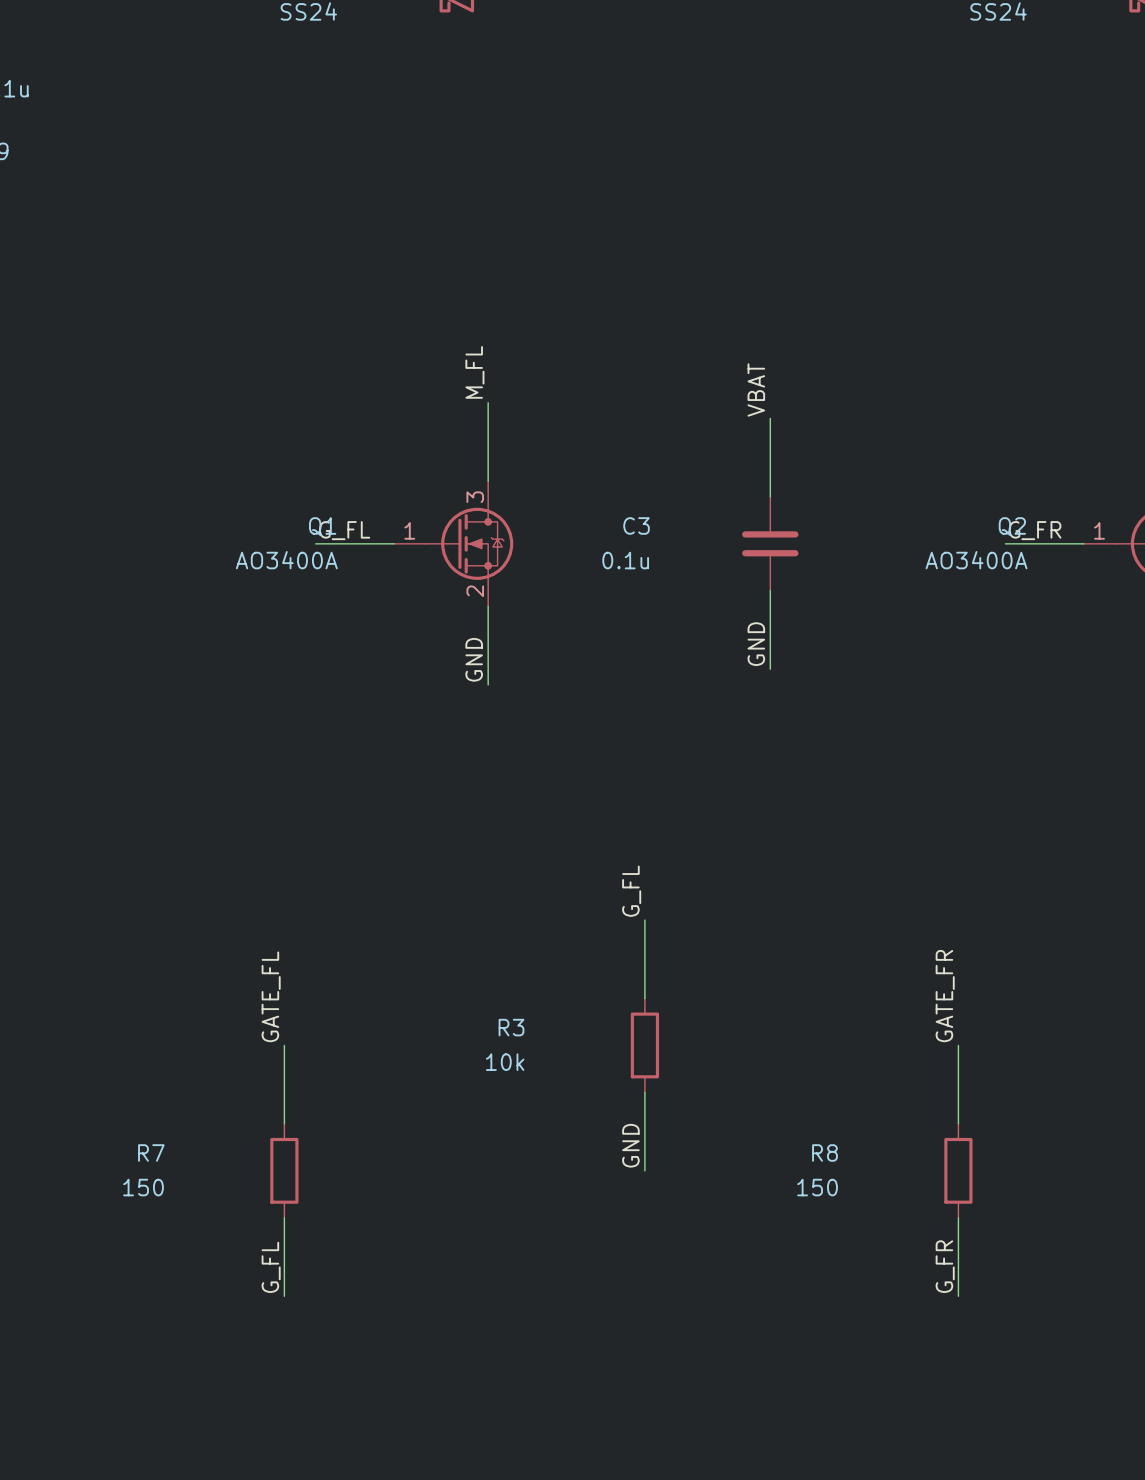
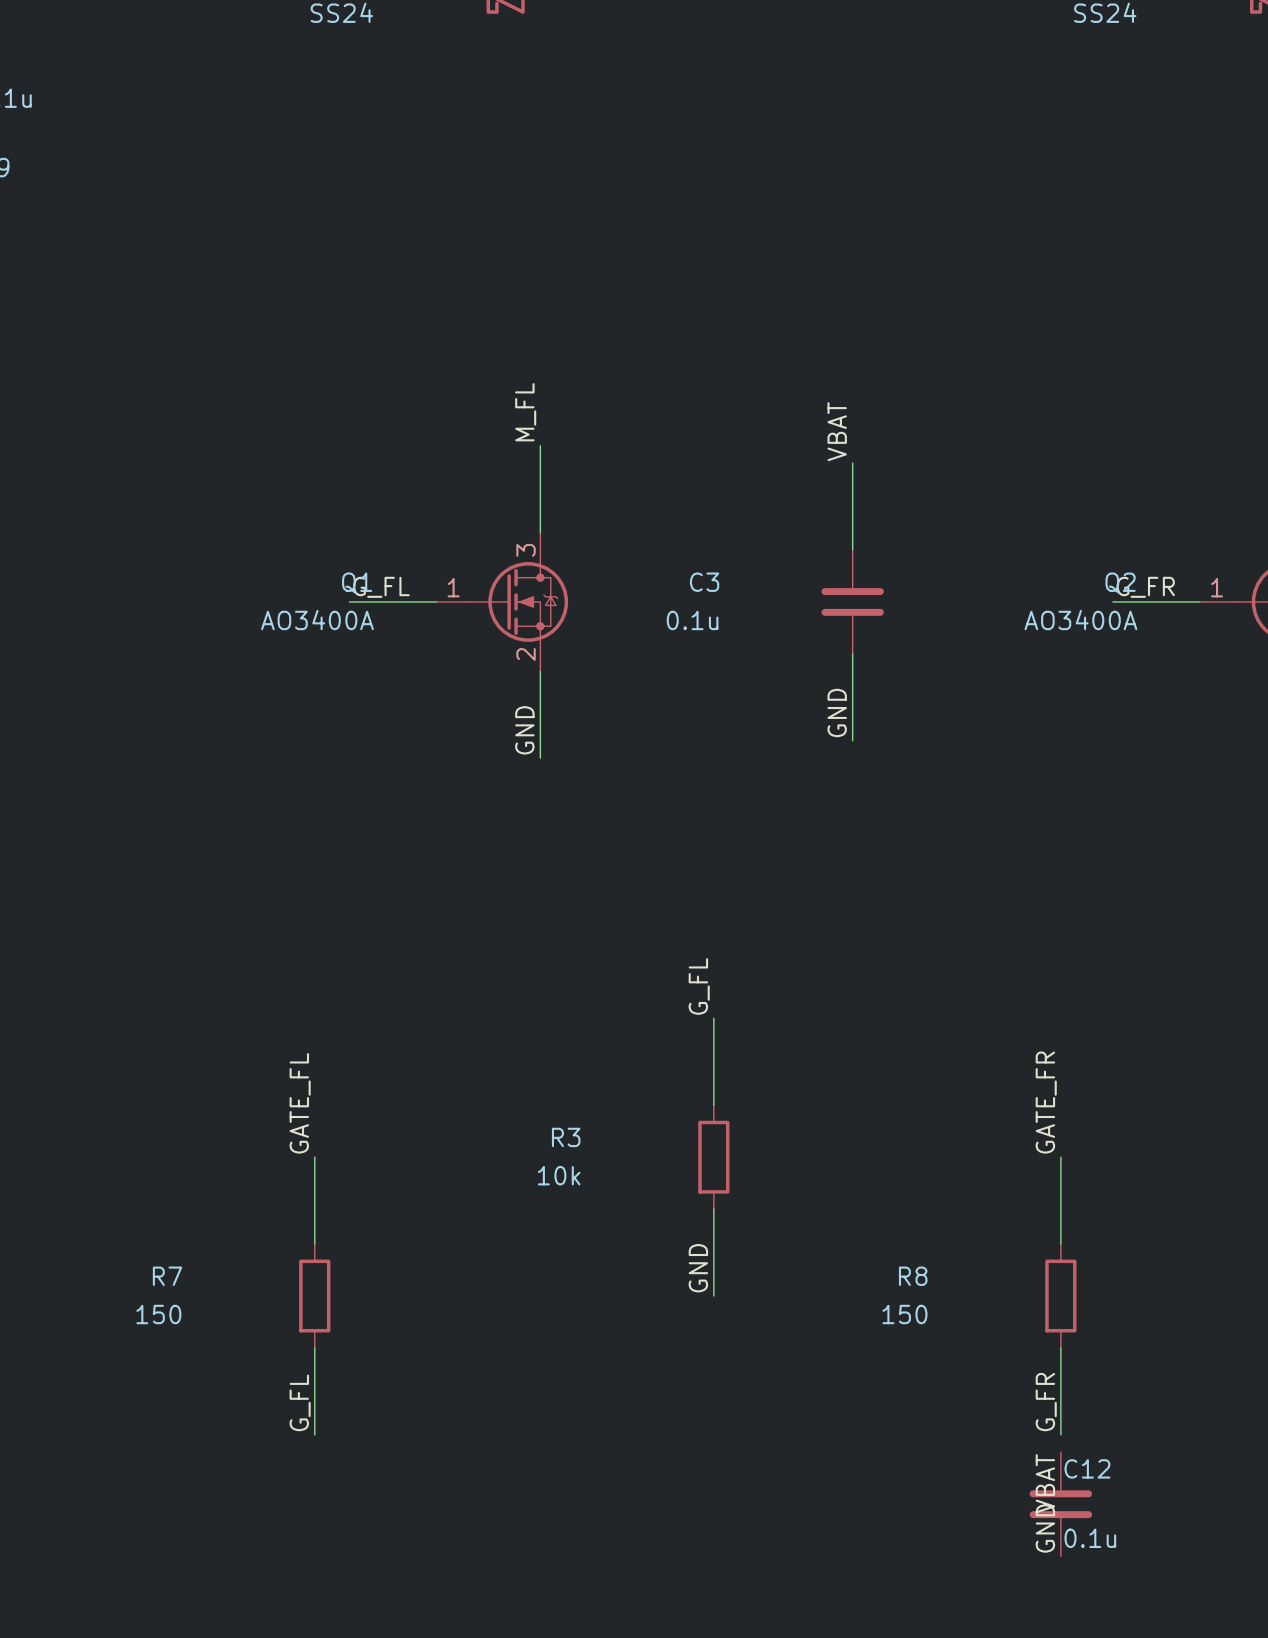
label: none -> VBAT (1045, 1483)
C12: none -> 0.1u (1060, 1504)
label: none -> GND (1045, 1528)

